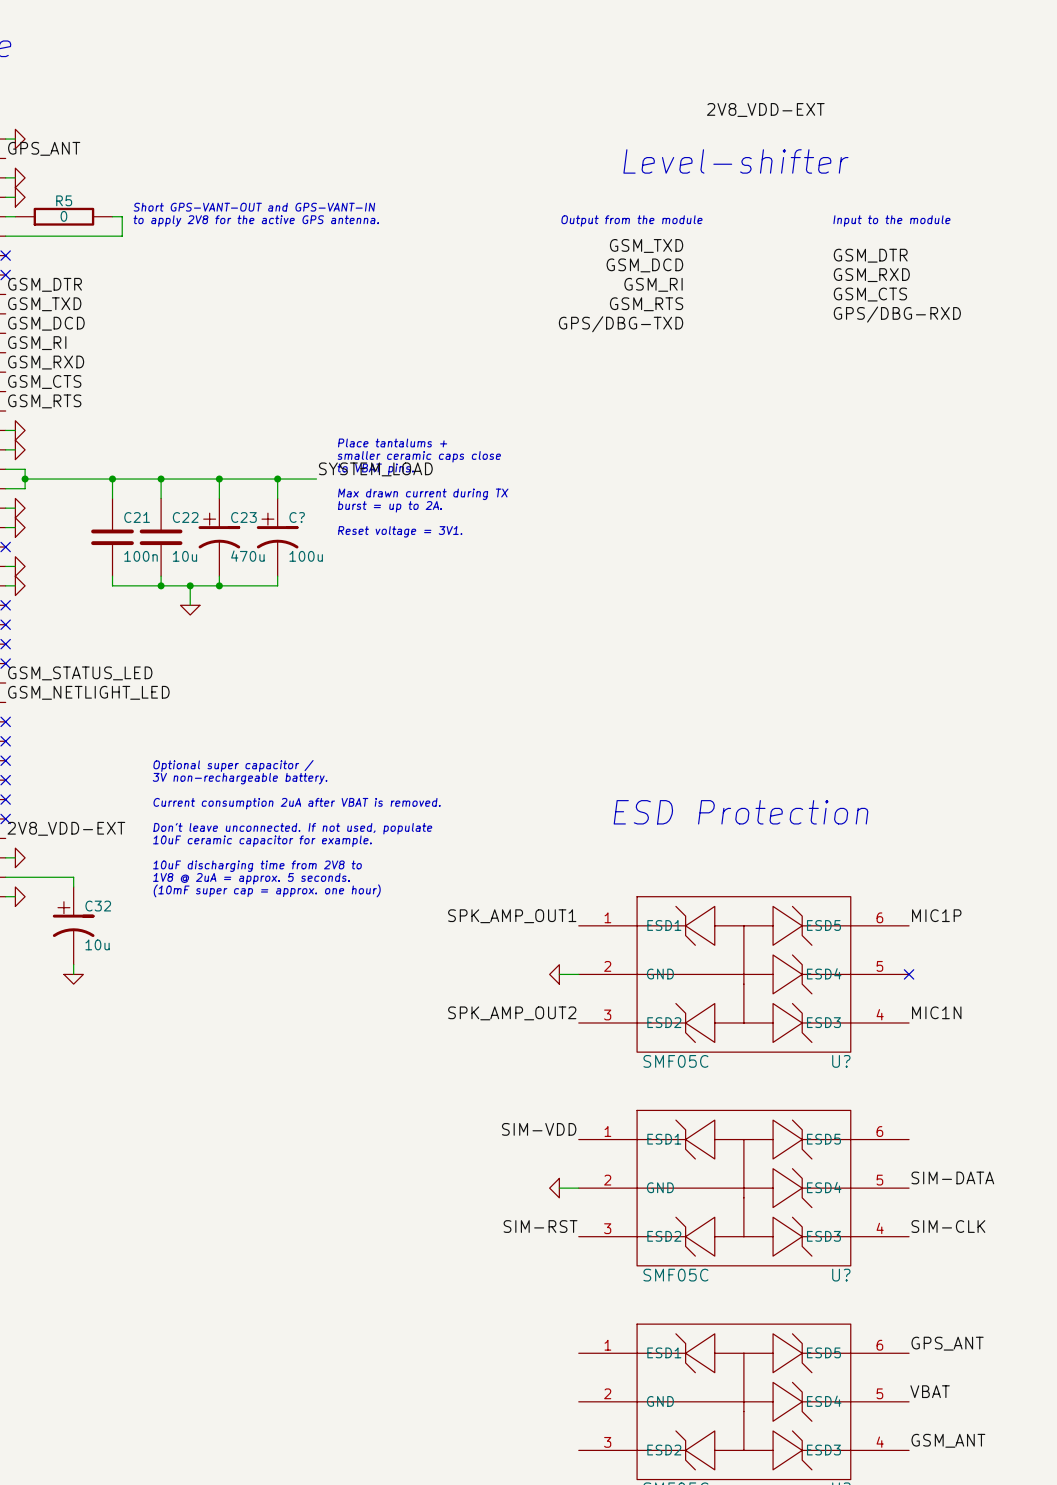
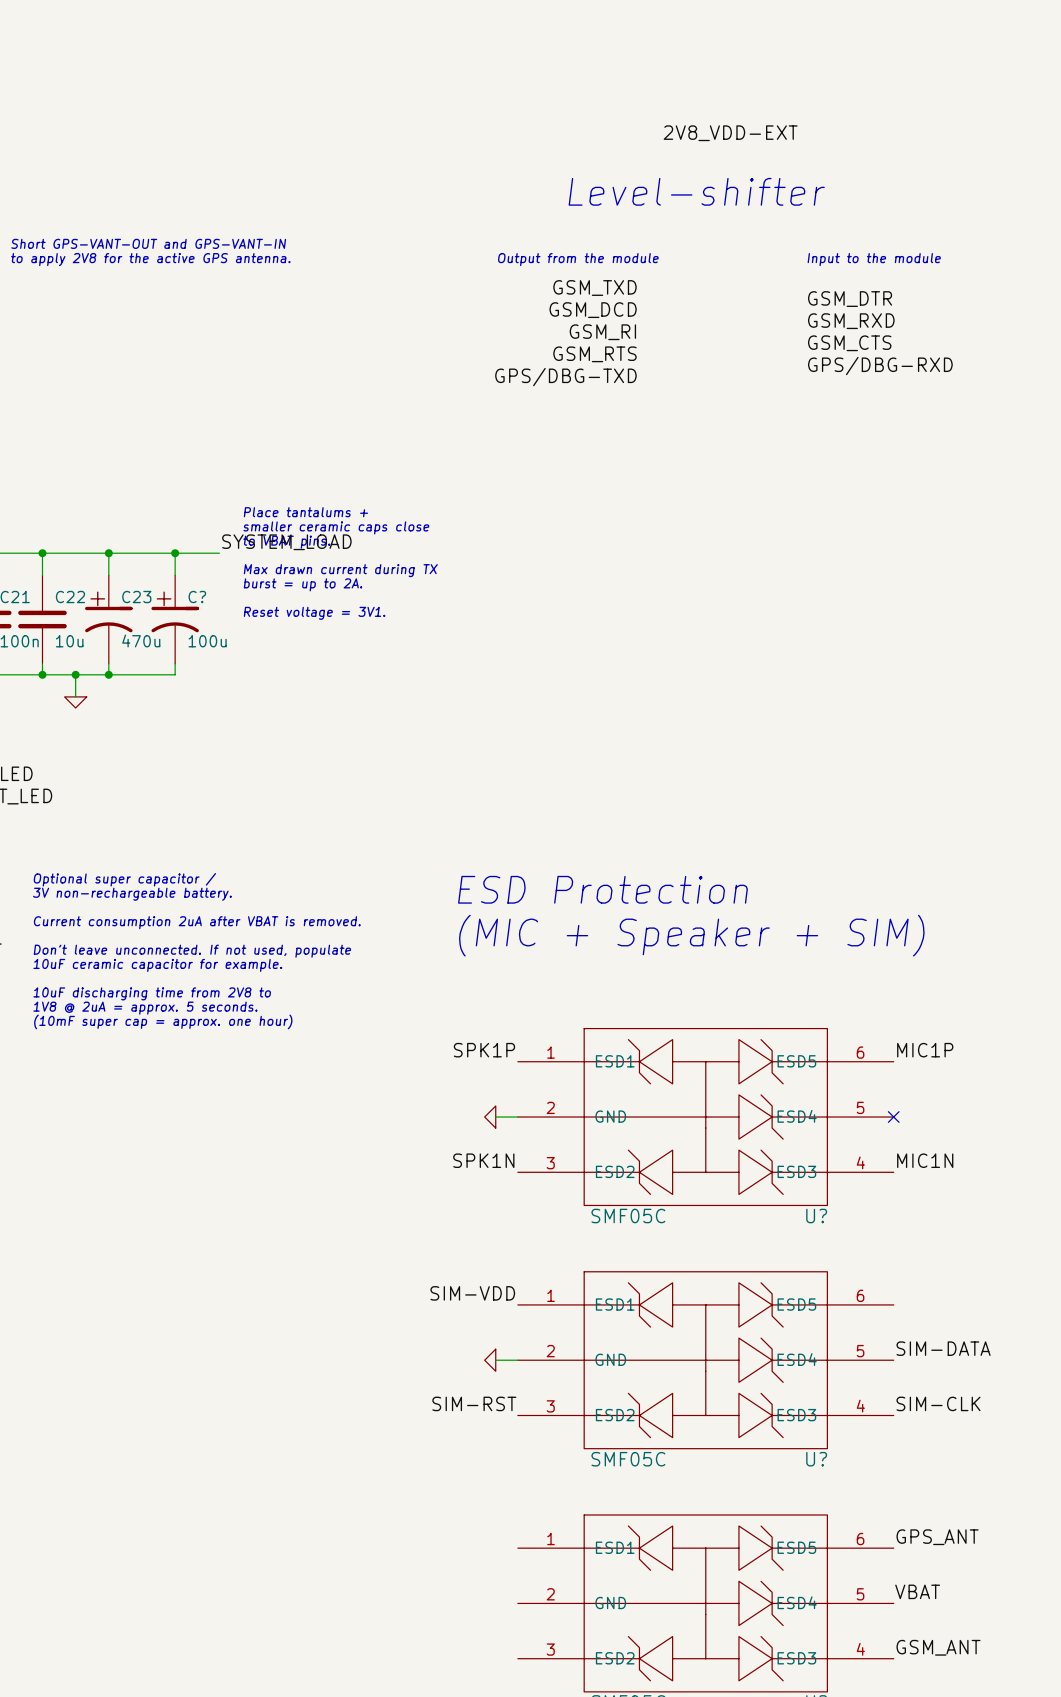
text position: ESD Protection (741, 812) -> ESD Protection (602, 889)
text: none -> (MIC + Speaker + SIM) (691, 935)
label: SPK_AMP_OUT1 (512, 916) -> SPK1P (484, 1050)
label: SPK_AMP_OUT2 (512, 1013) -> SPK1N (483, 1160)

